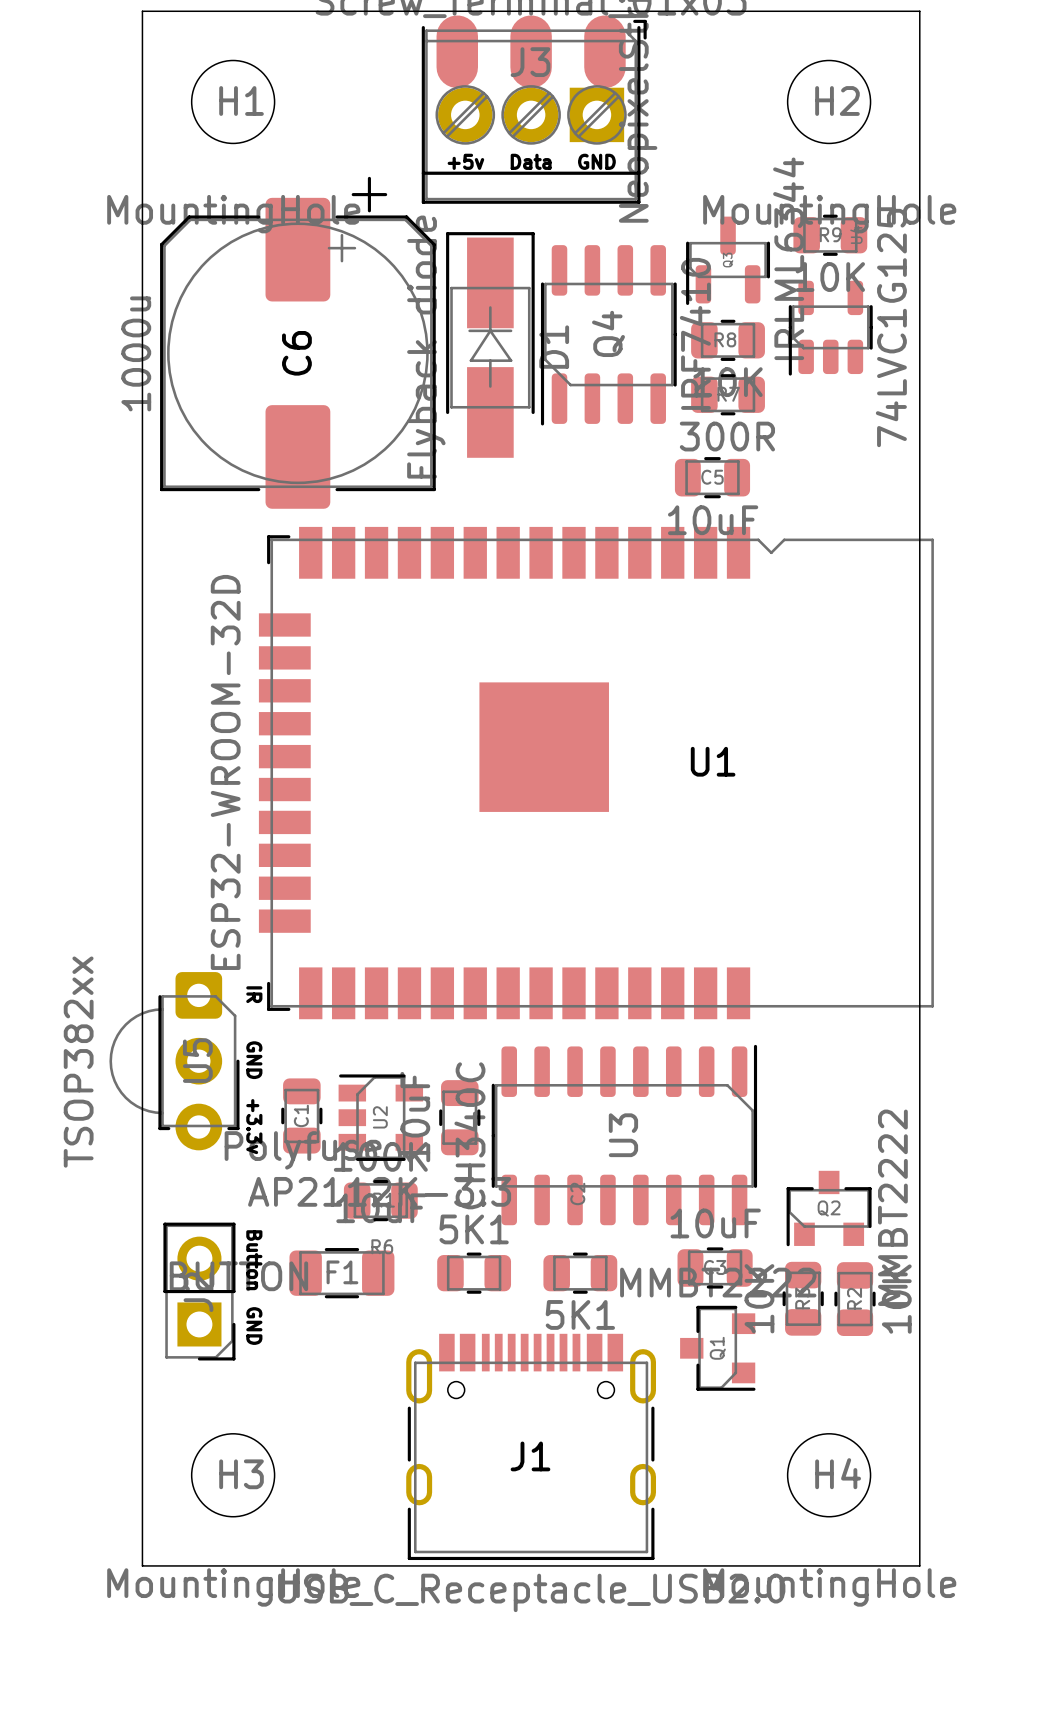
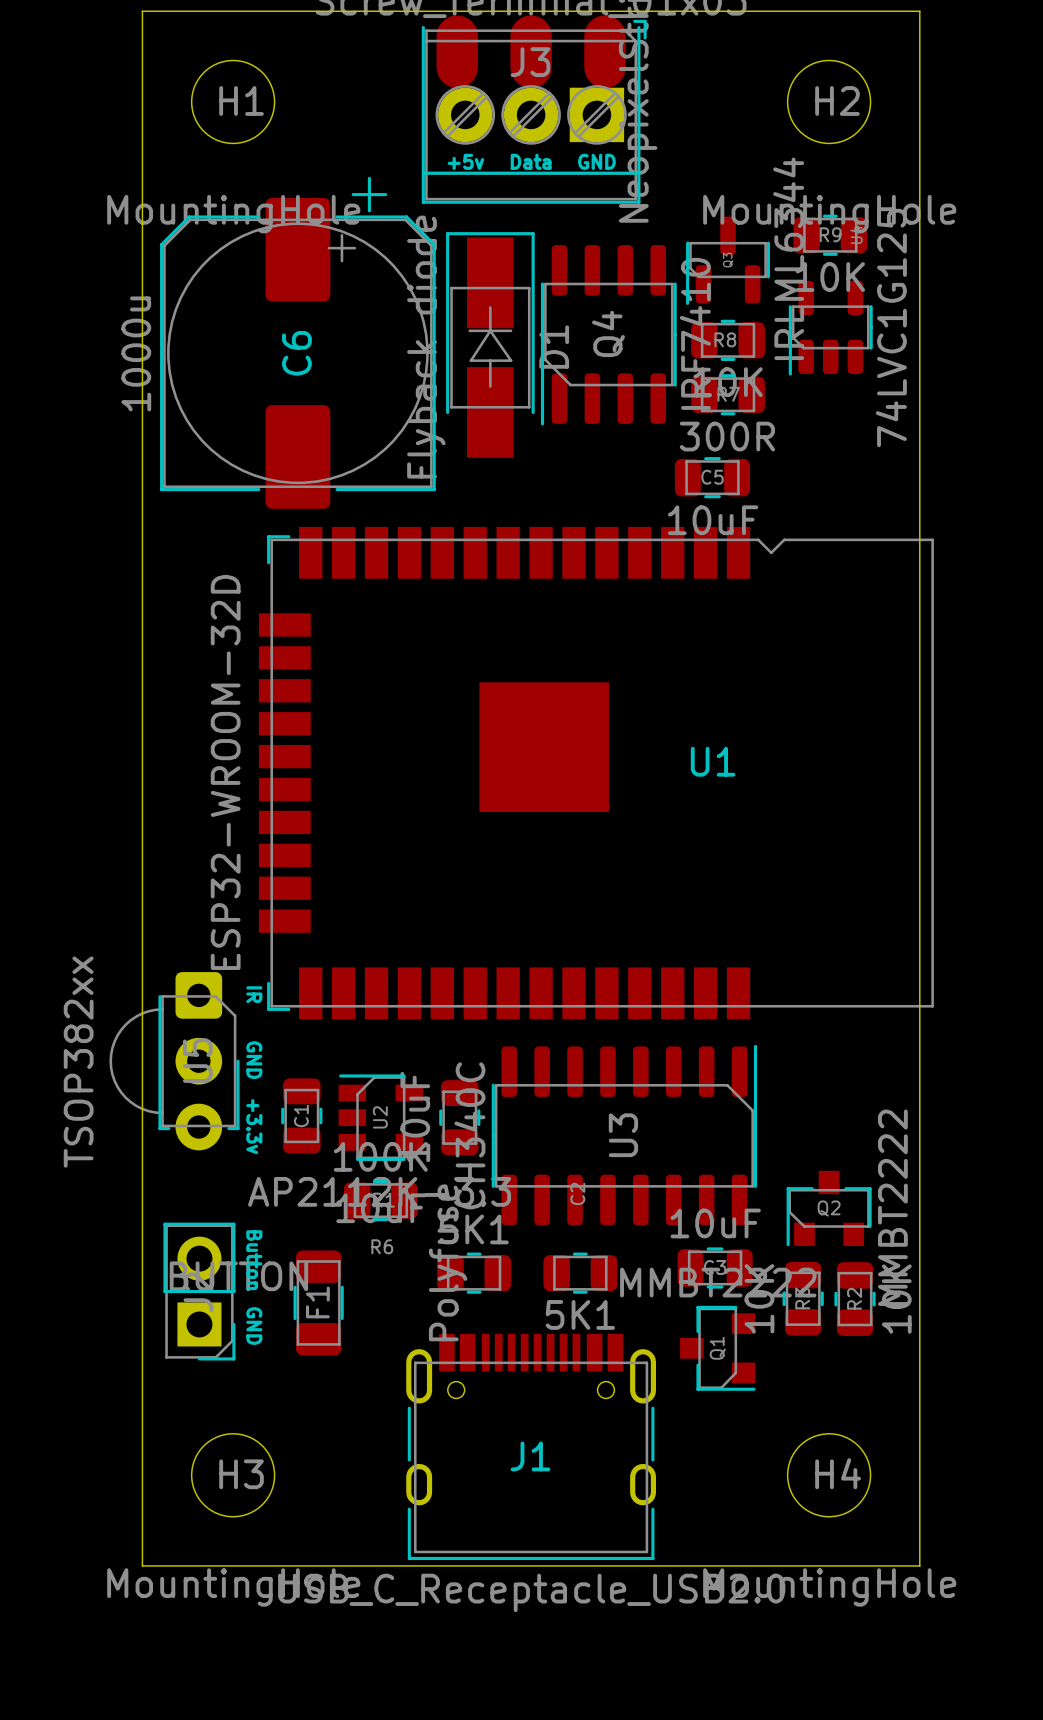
F1 rotation: 0° (341, 1273) -> 90° clockwise (318, 1302)

